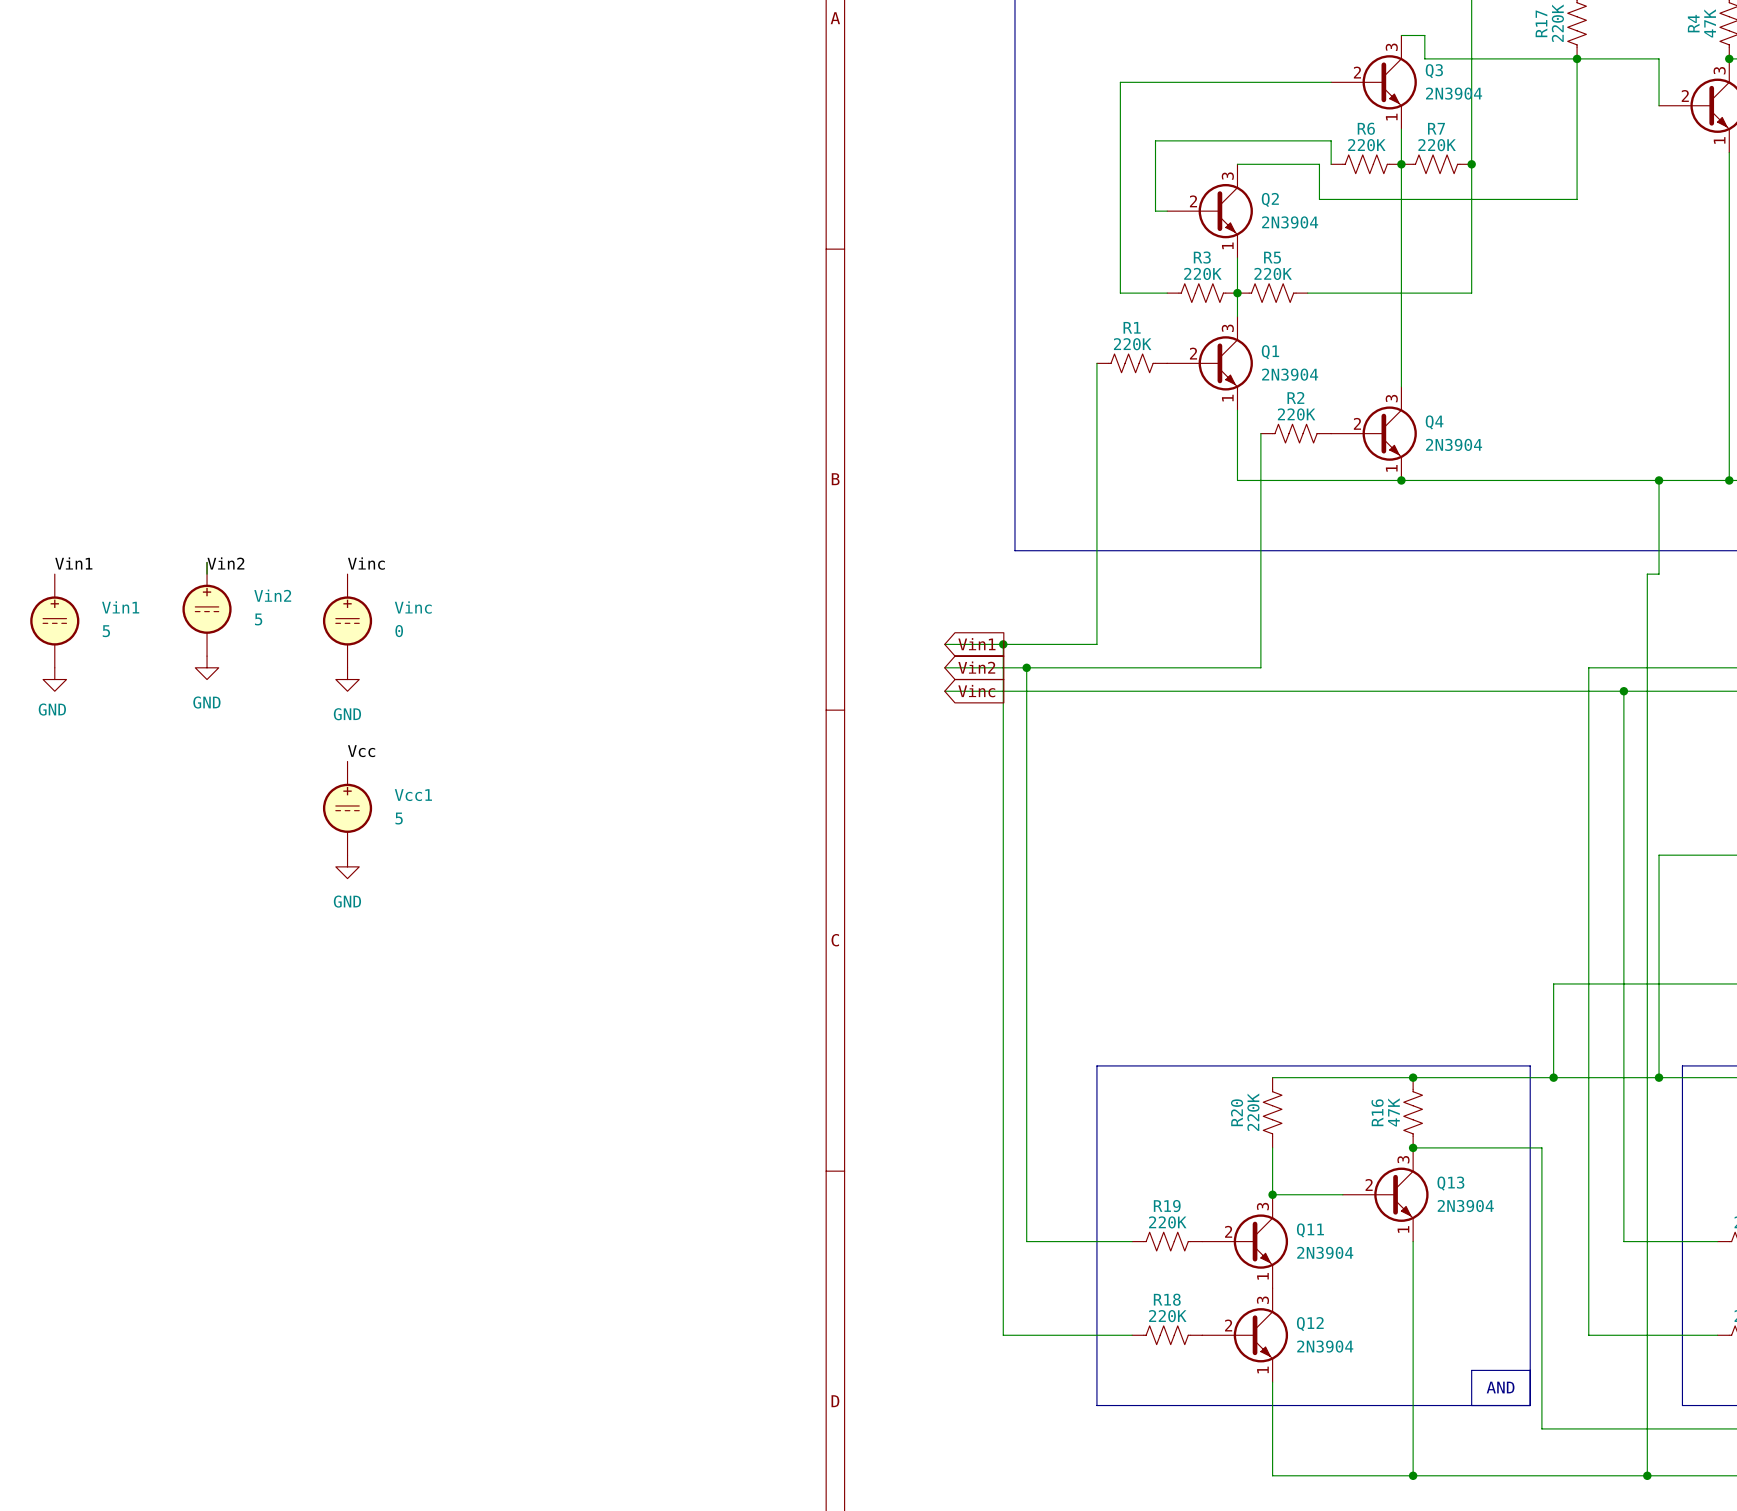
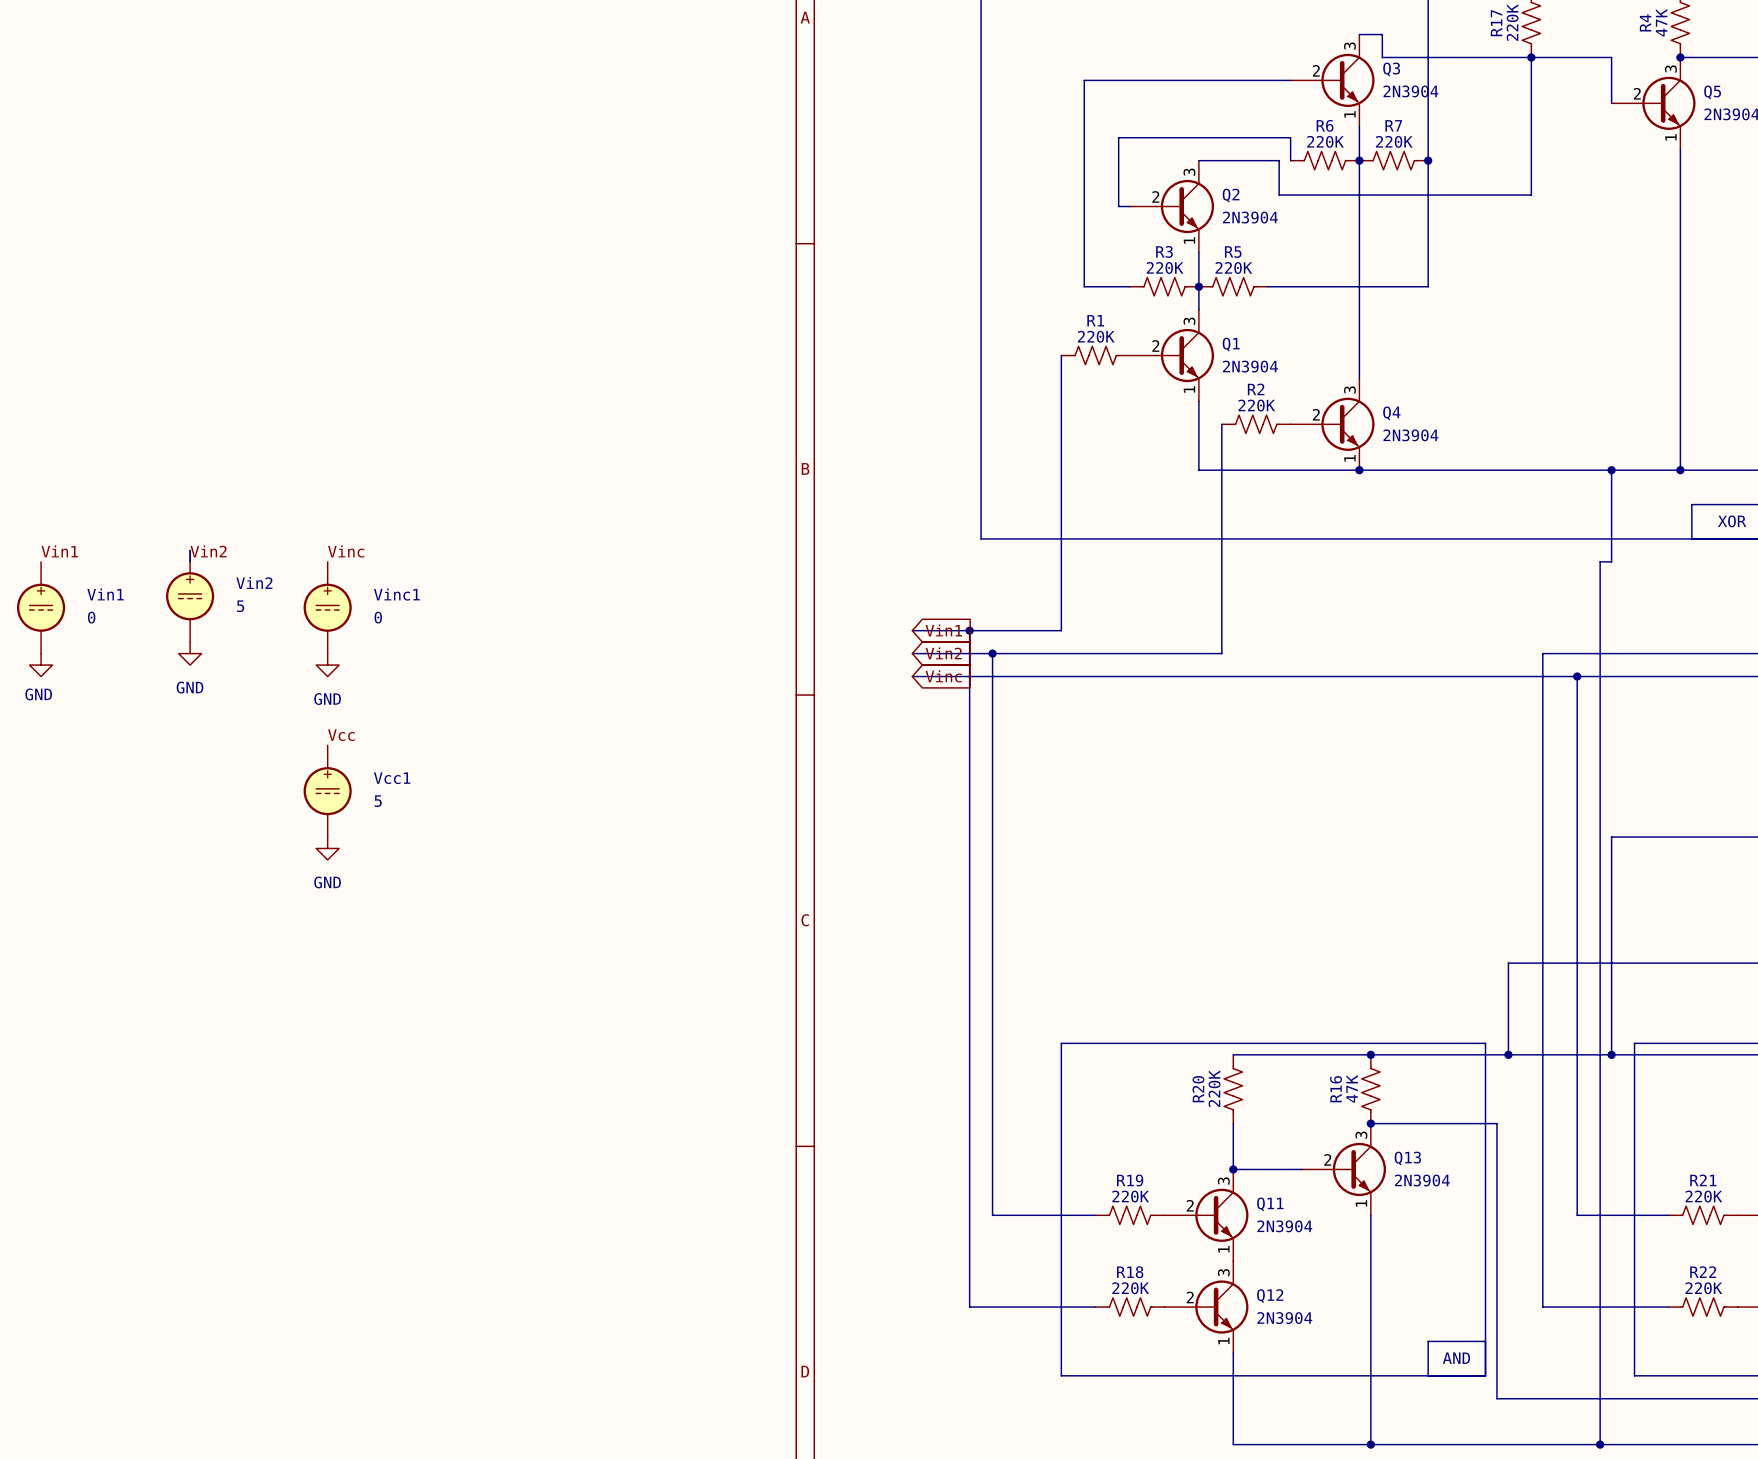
Vinc name: Vinc (413, 607) -> Vinc1 (396, 594)
Vin1 value: 5 (106, 631) -> 0 (91, 617)

